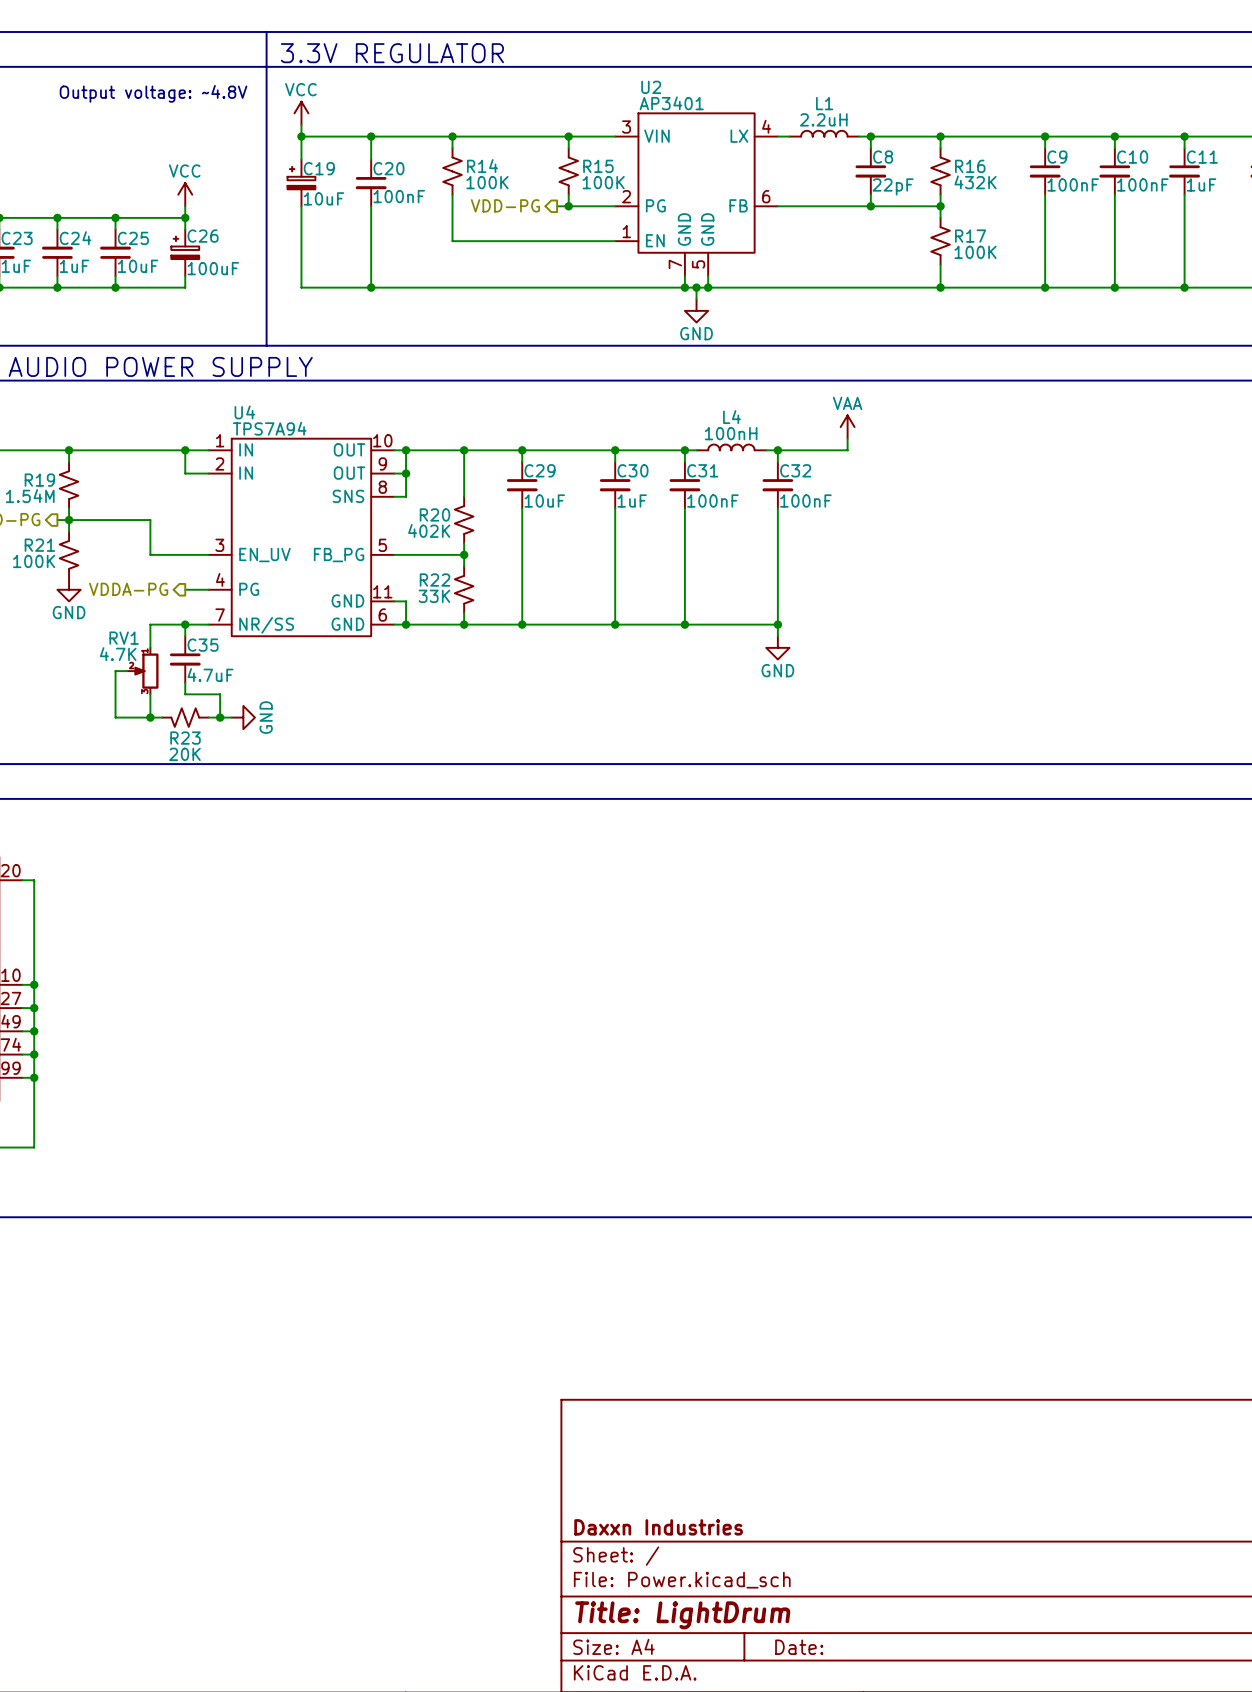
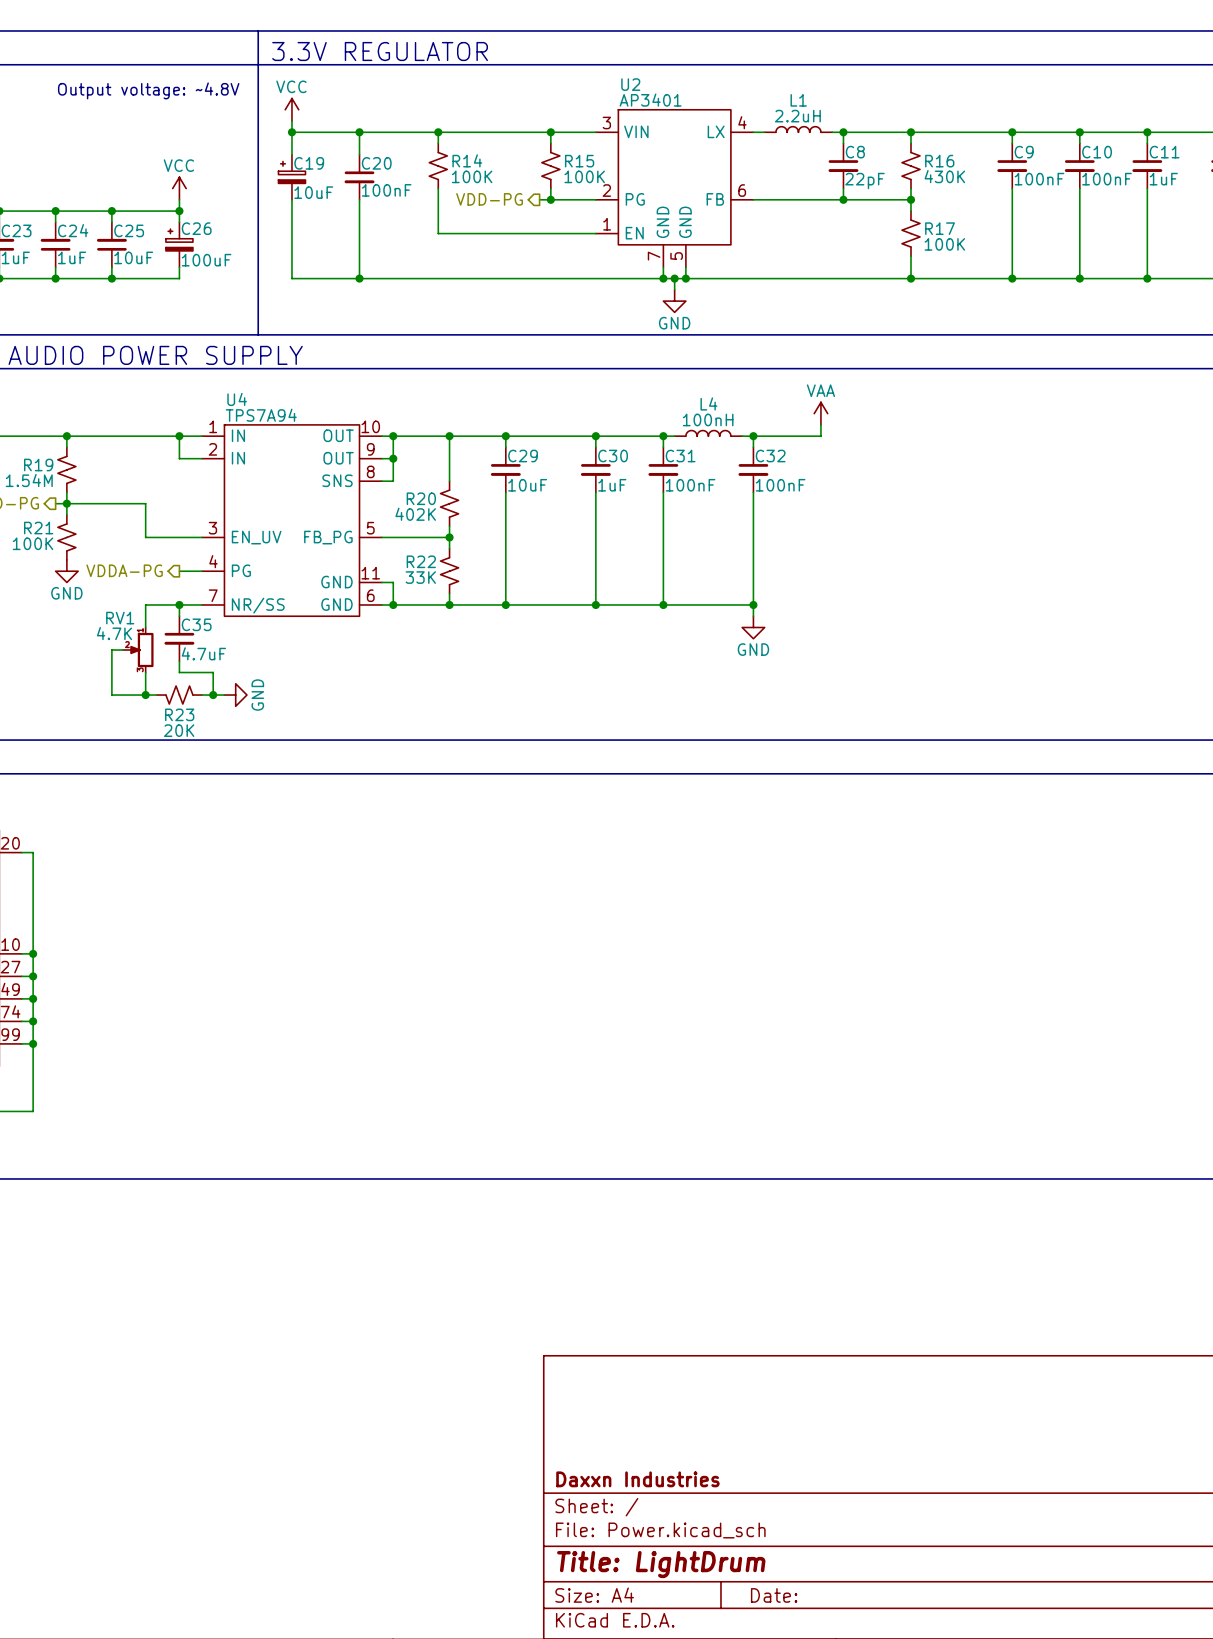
R16 value: 432K (975, 182) -> 430K (944, 176)

